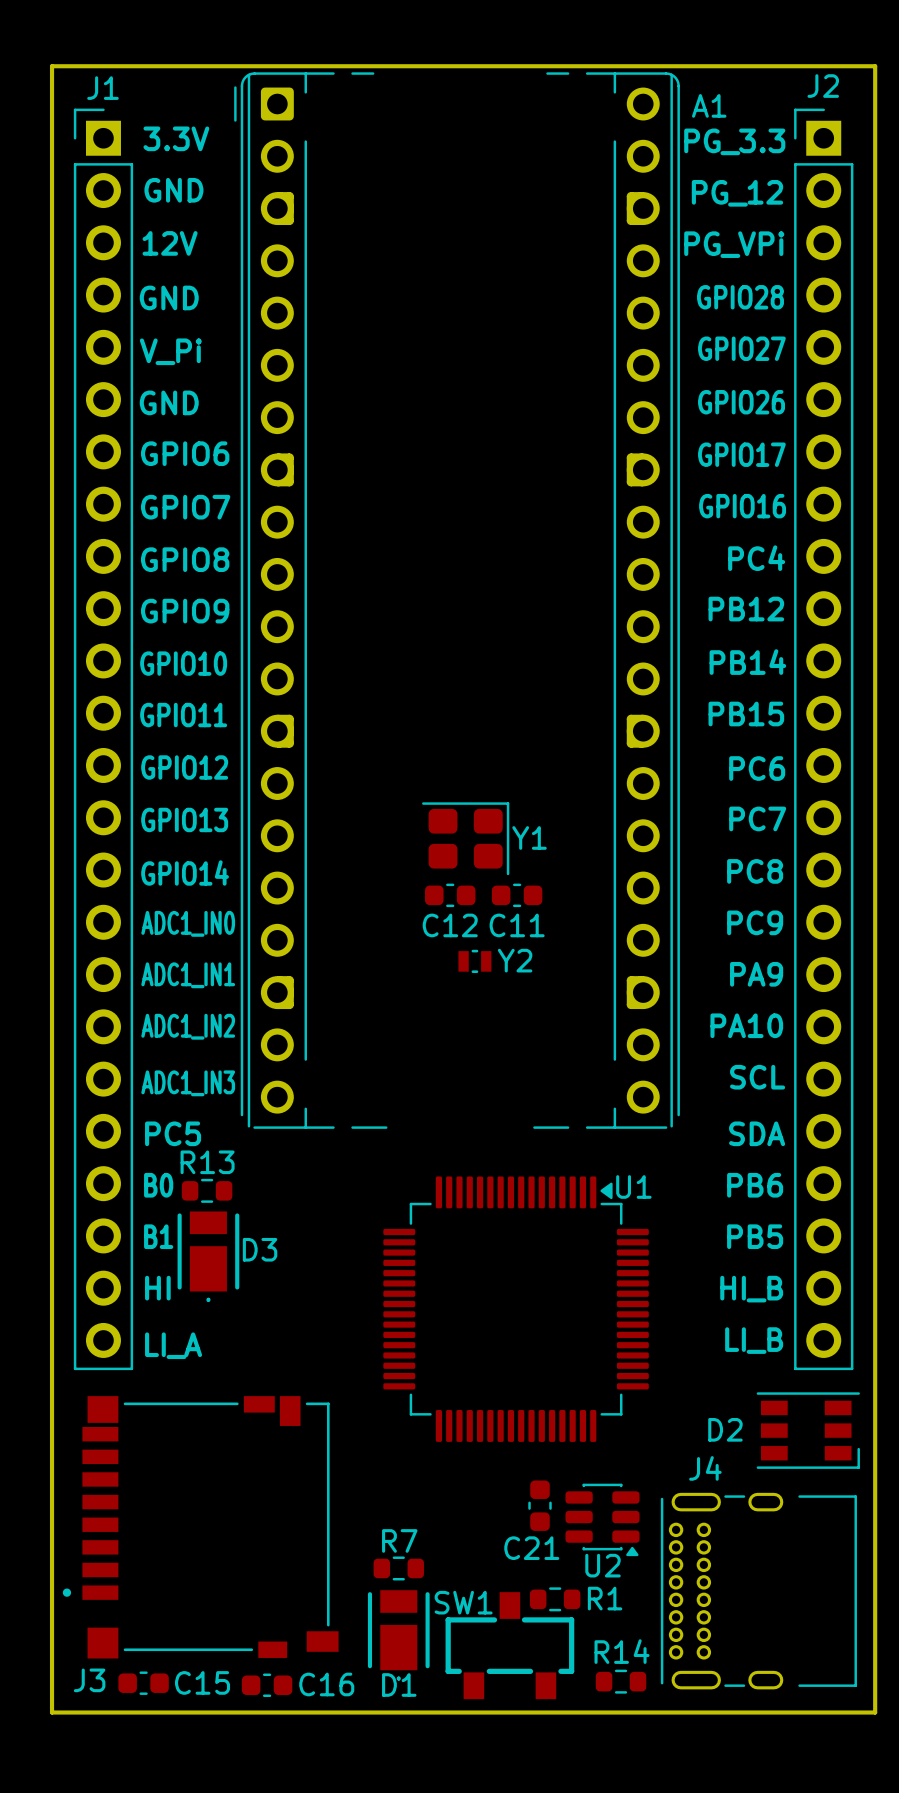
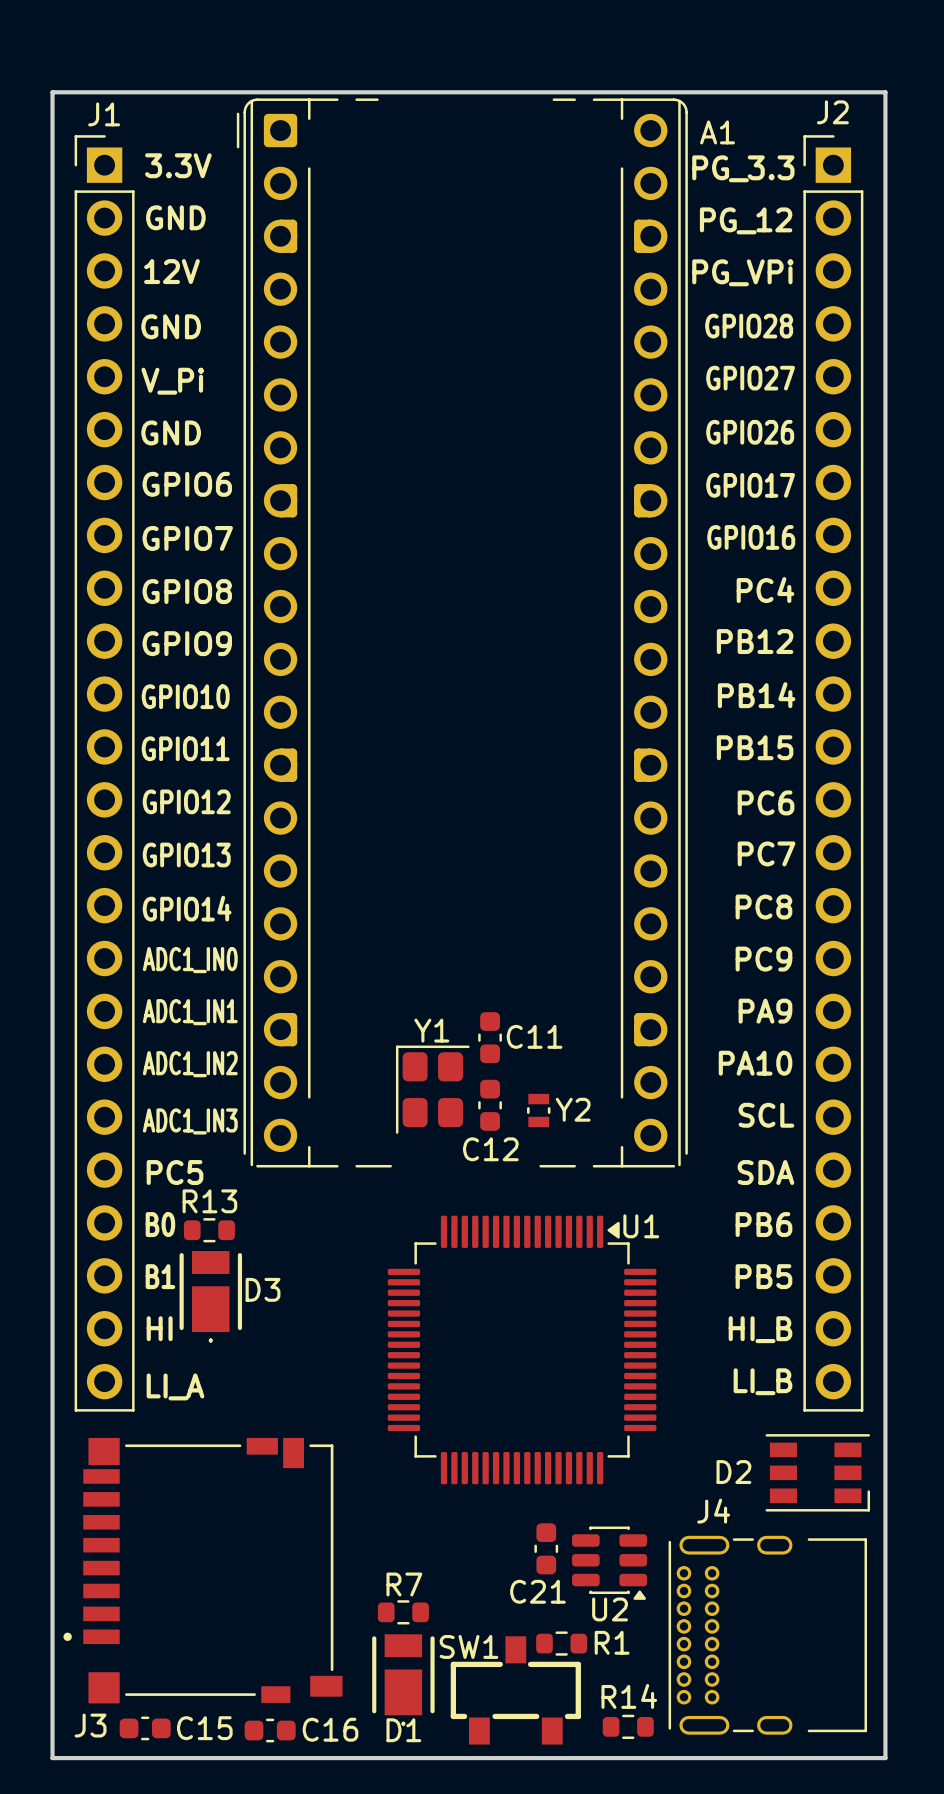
Y1 rotation: 0° (465, 838) -> 90° counterclockwise (432, 1089)
Y1 position: (465, 838) -> (432, 1089)
C12 rotation: 0° (450, 895) -> 90° clockwise (490, 1105)
C12 position: (450, 895) -> (490, 1105)
C11 rotation: 0° (517, 895) -> 90° clockwise (490, 1037)
C11 position: (517, 895) -> (490, 1037)
C11 name position: C11 (517, 925) -> C11 (534, 1036)
Y2 rotation: 0° (474, 961) -> 90° clockwise (538, 1110)
Y2 position: (474, 961) -> (538, 1110)

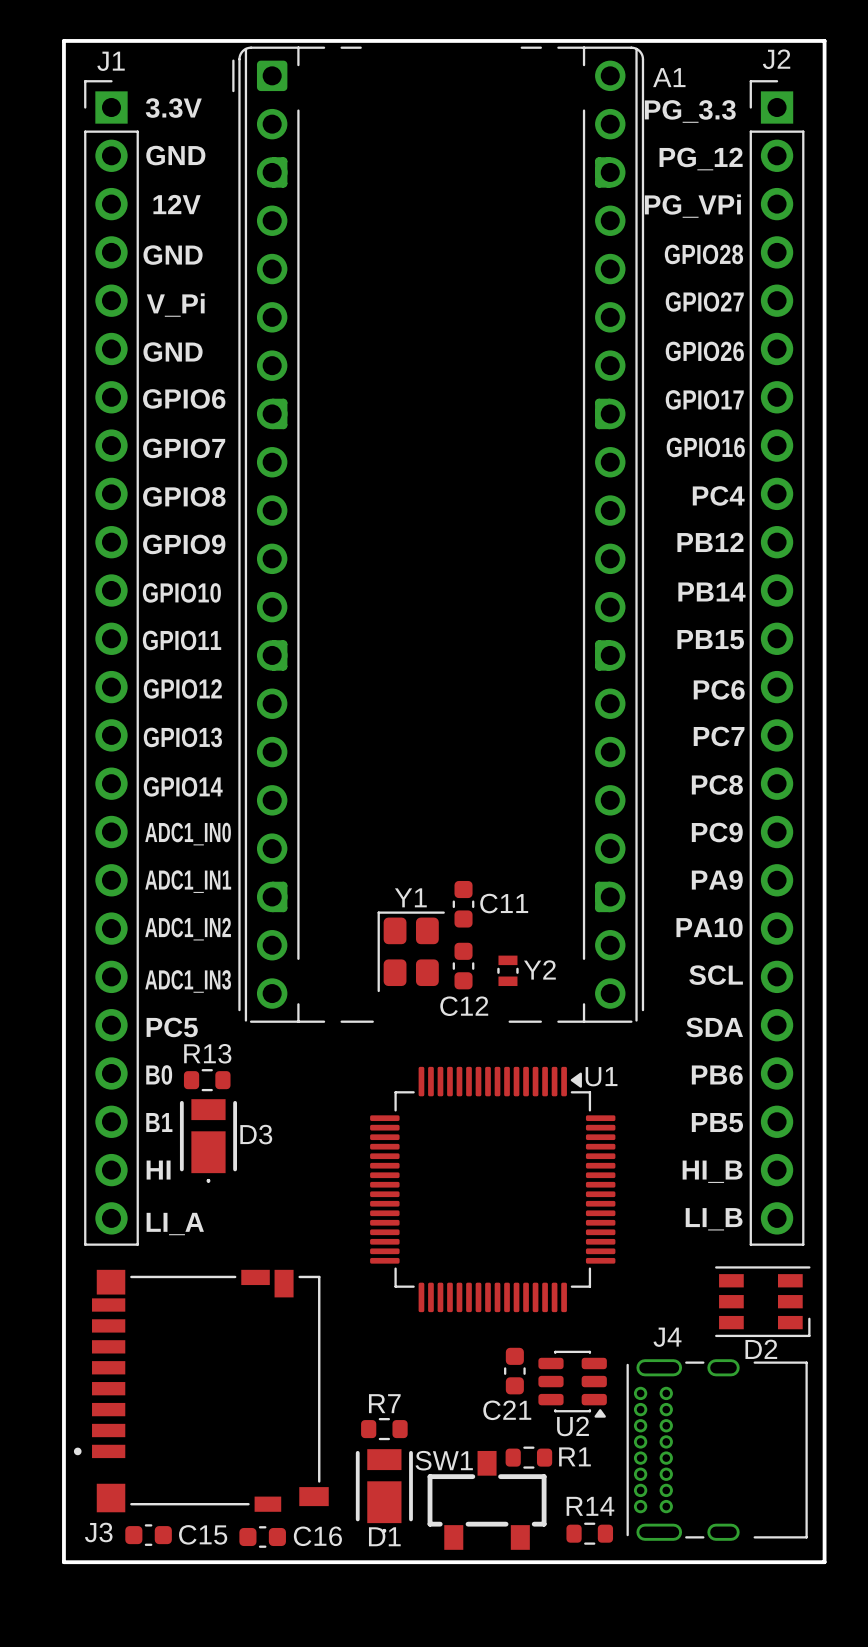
D2 name position: D2 (733, 1472) -> D2 (761, 1349)

